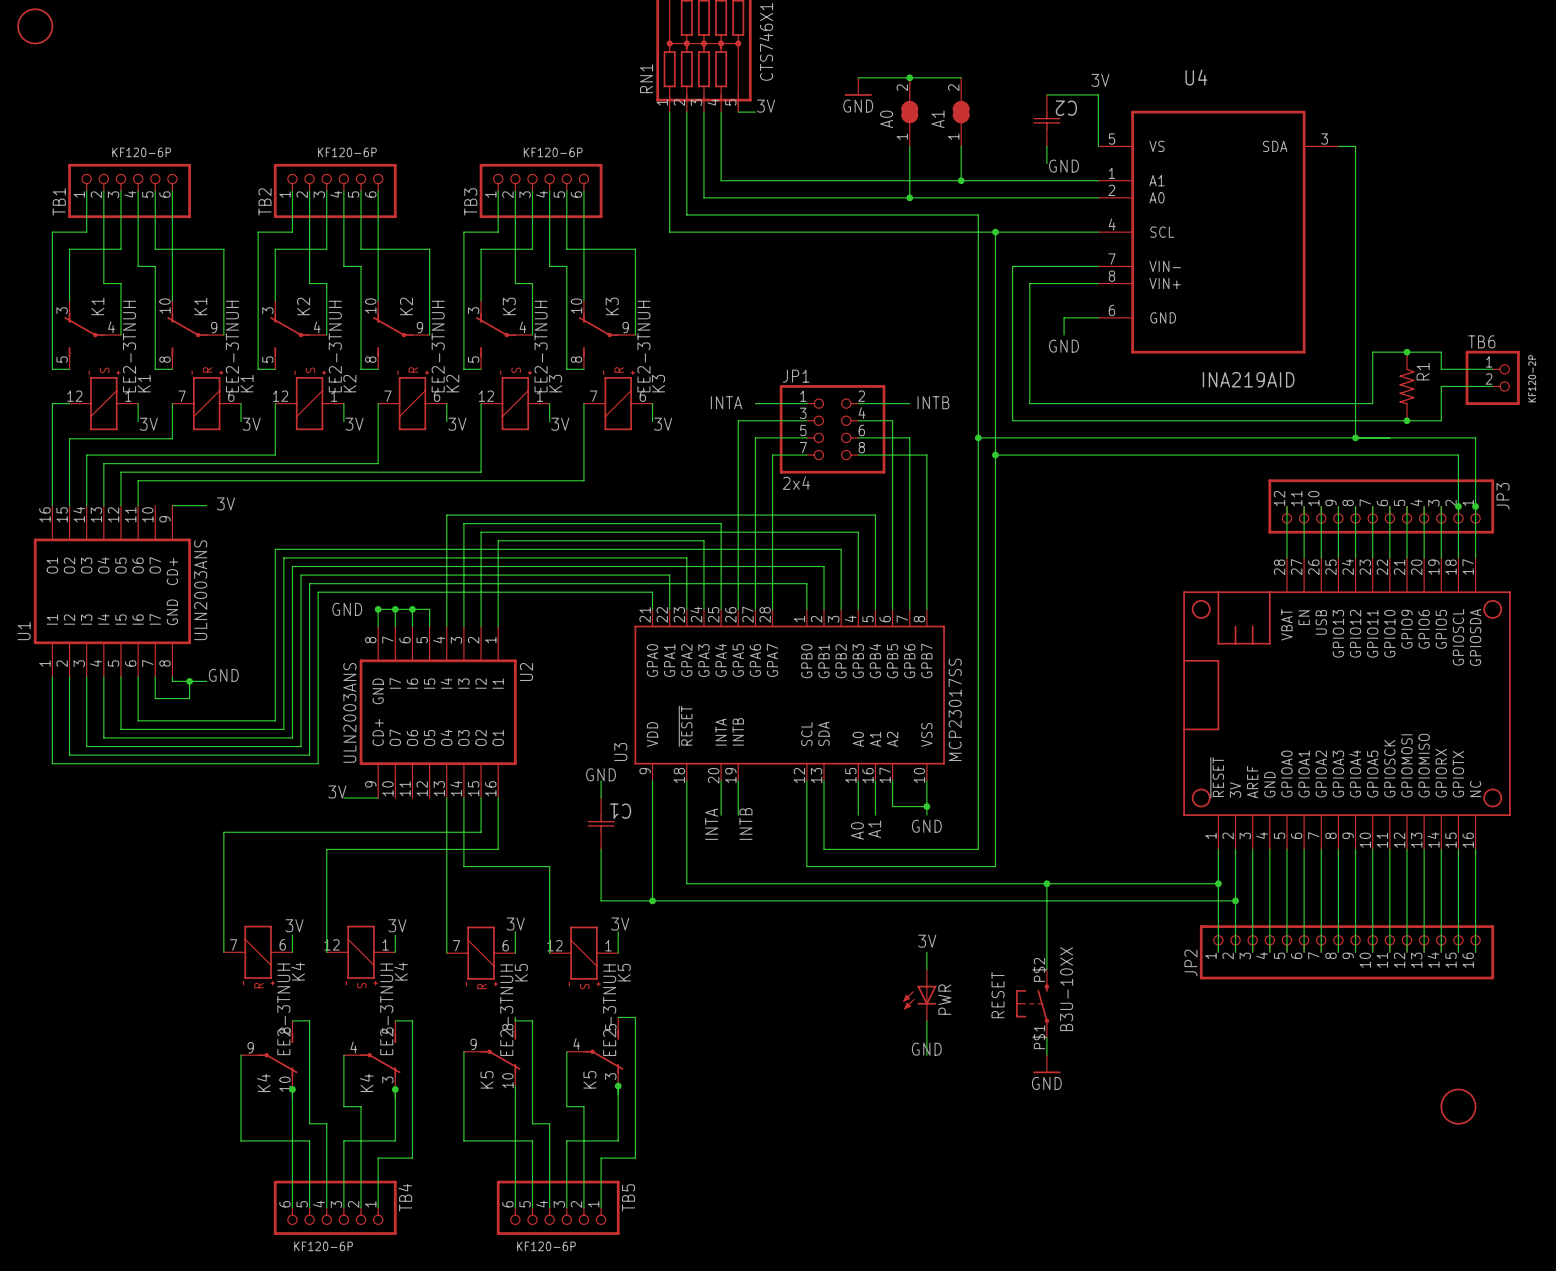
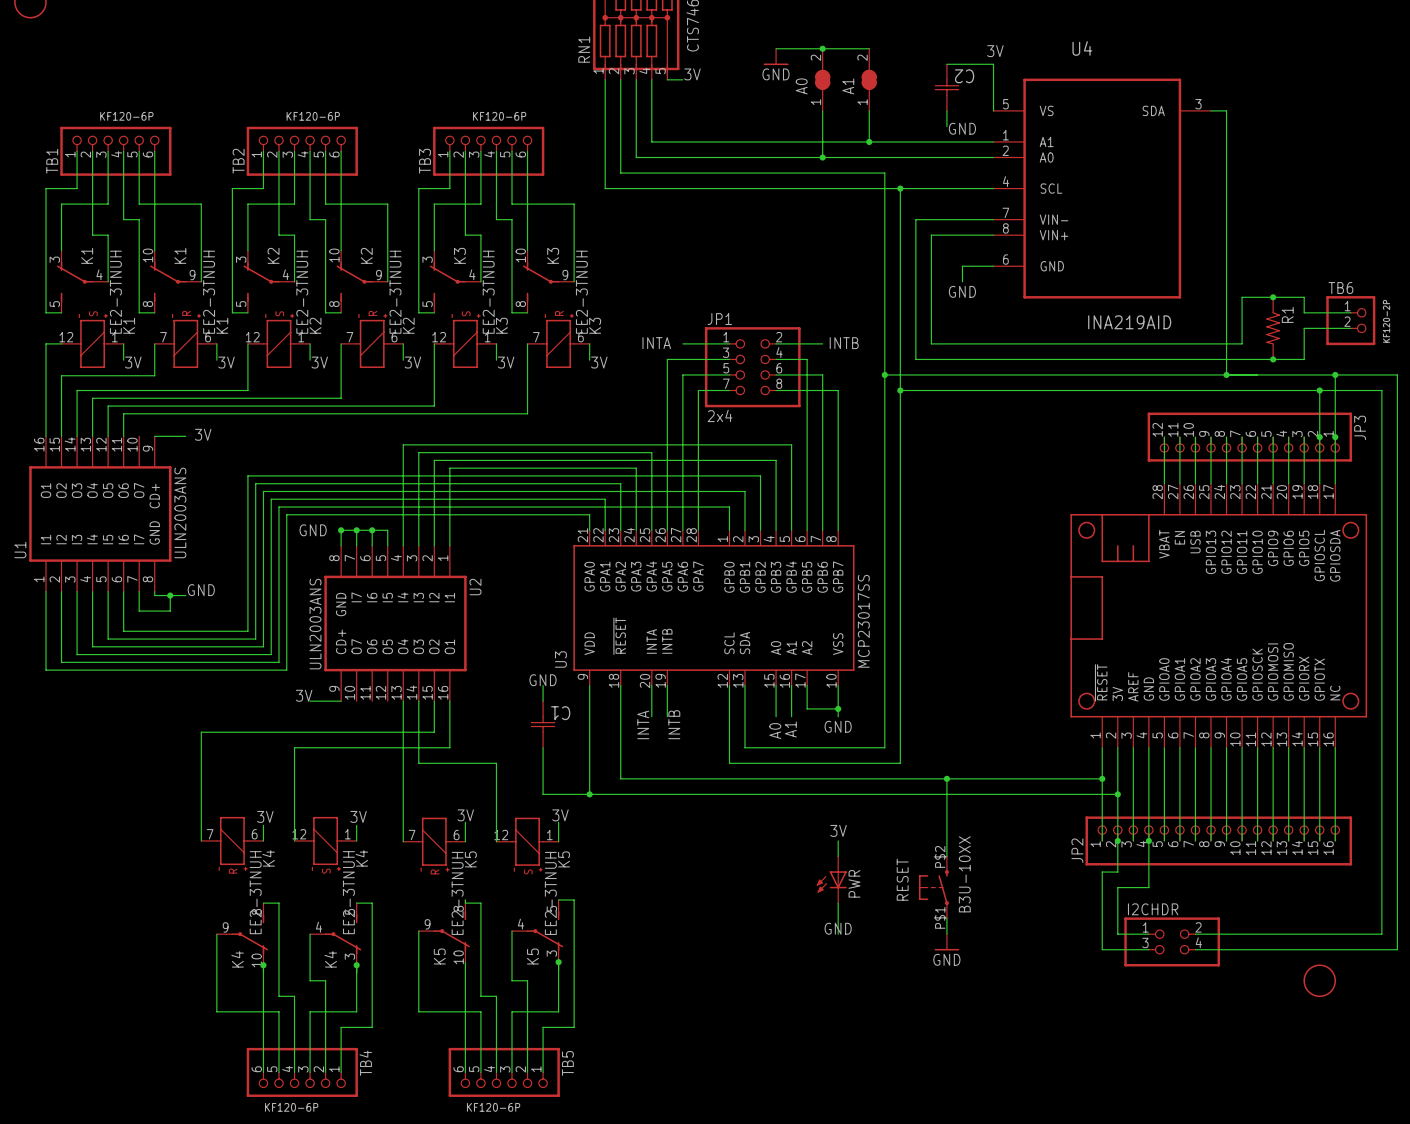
wire: none -> (1335, 374) (1397, 374) (1397, 949) (1195, 949)
junction: none -> (1335, 374)
wire: none -> (1319, 390) (1381, 390) (1381, 934) (1195, 934)
junction: none -> (1319, 390)
wire: none -> (1117, 840) (1117, 872) (1102, 872) (1102, 949) (1148, 949)
junction: none -> (1117, 840)
wire: none -> (1148, 840) (1148, 887) (1117, 887) (1117, 934) (1148, 934)
junction: none -> (1148, 840)
I2CHDR: none -> (1172, 941)

